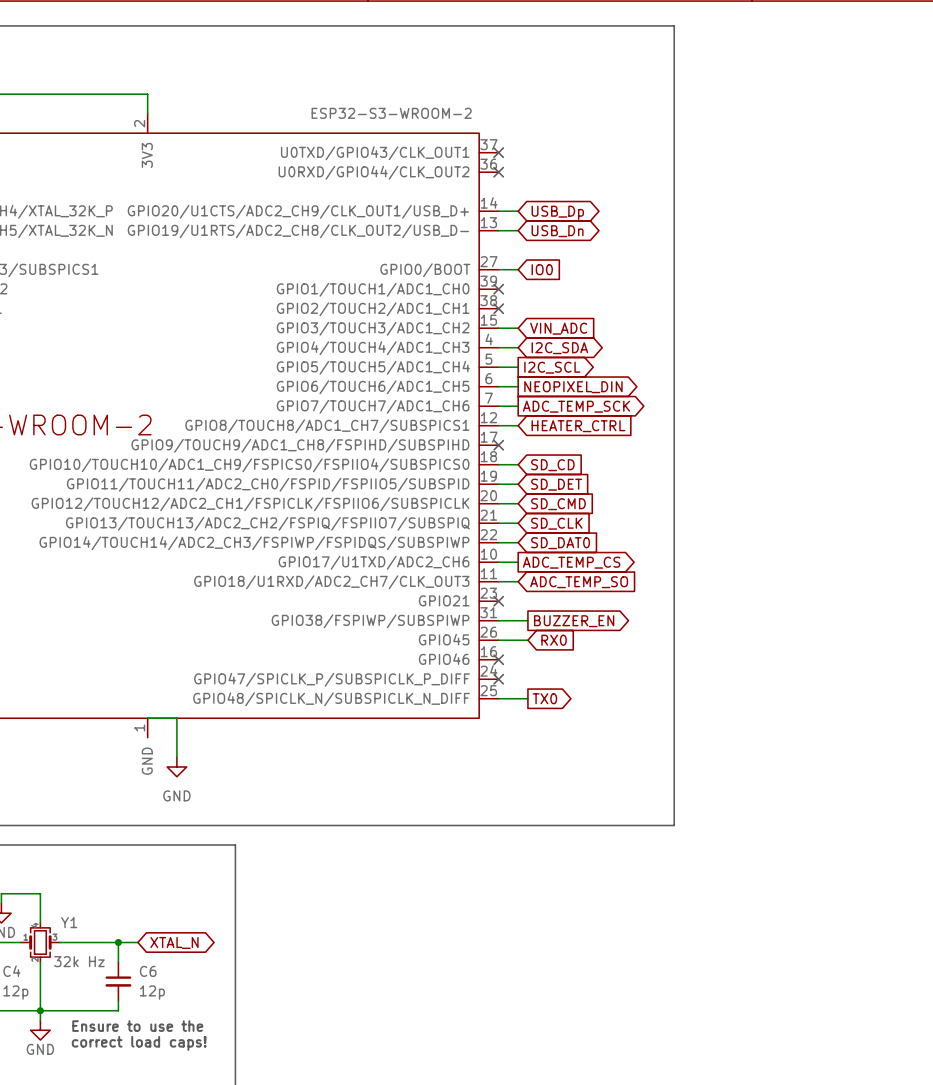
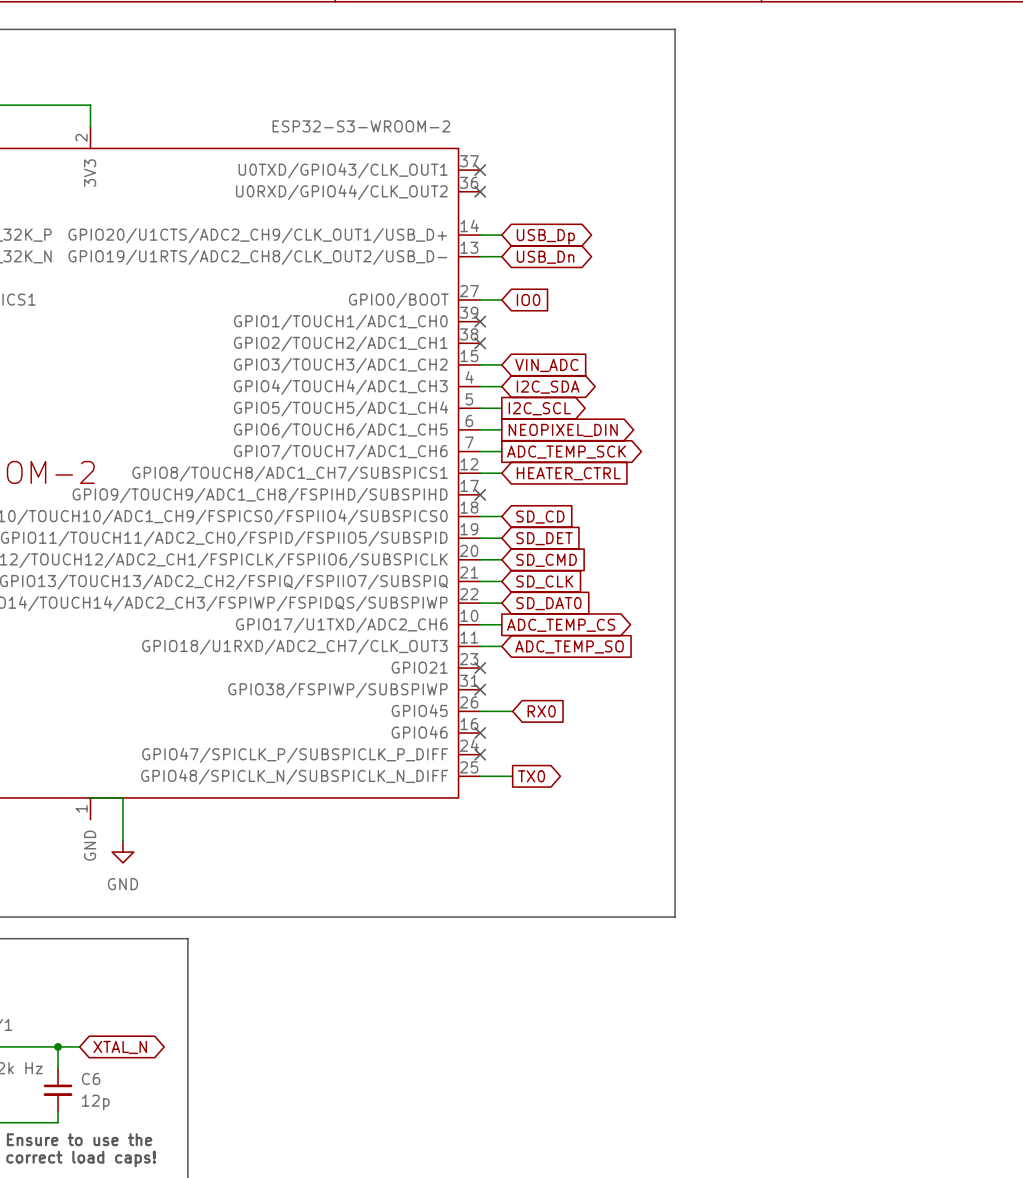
wire: (498, 620) (527, 620) -> none
no-connect mark: none -> (480, 689)
global label: BUZZER_EN (574, 621) -> none

